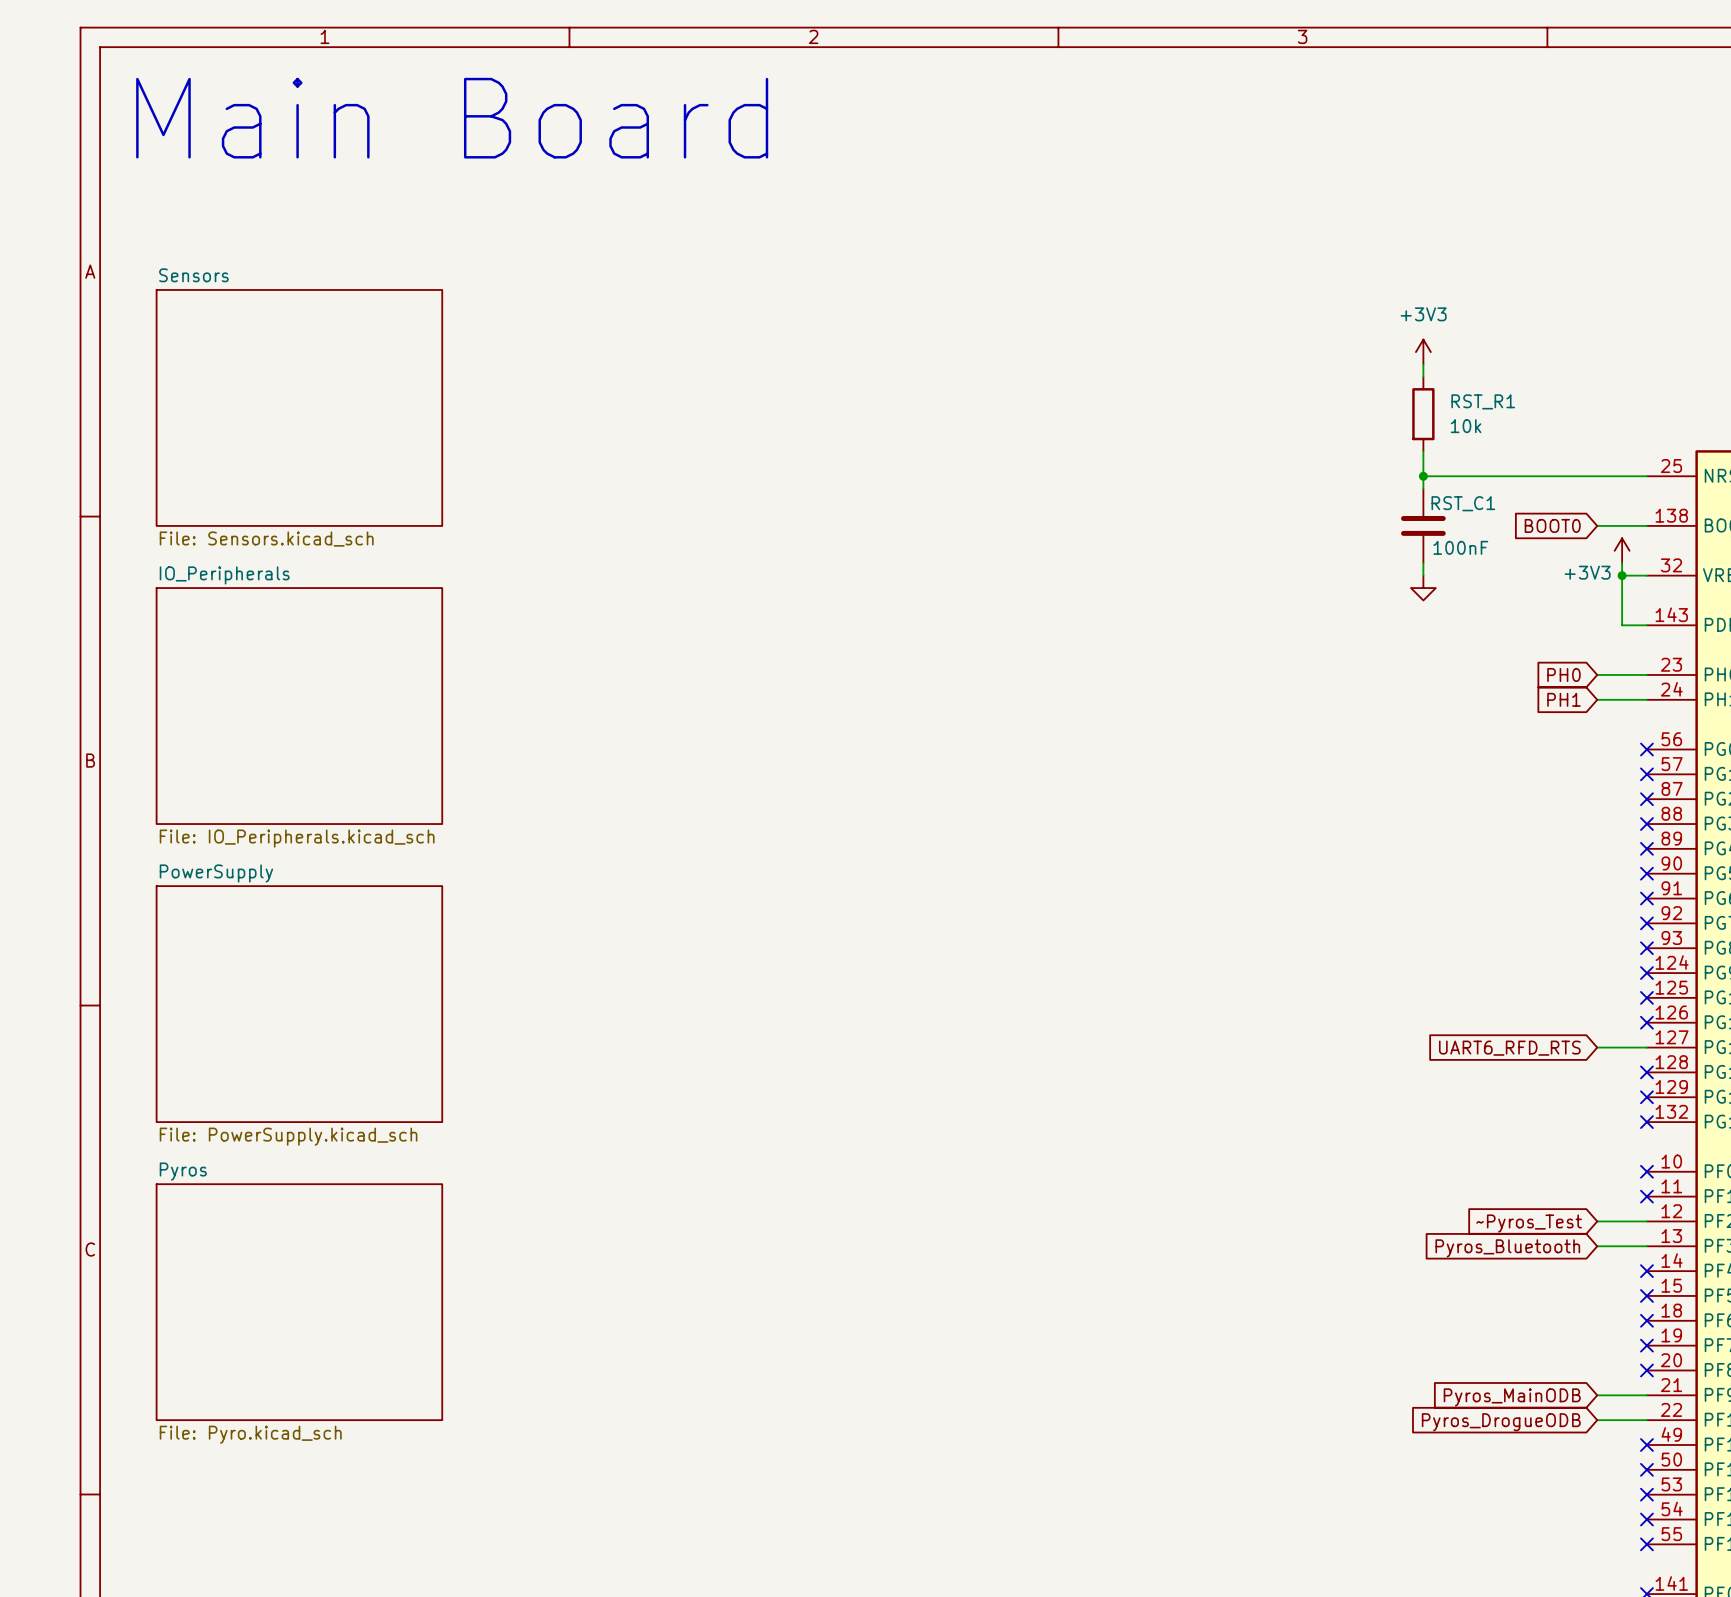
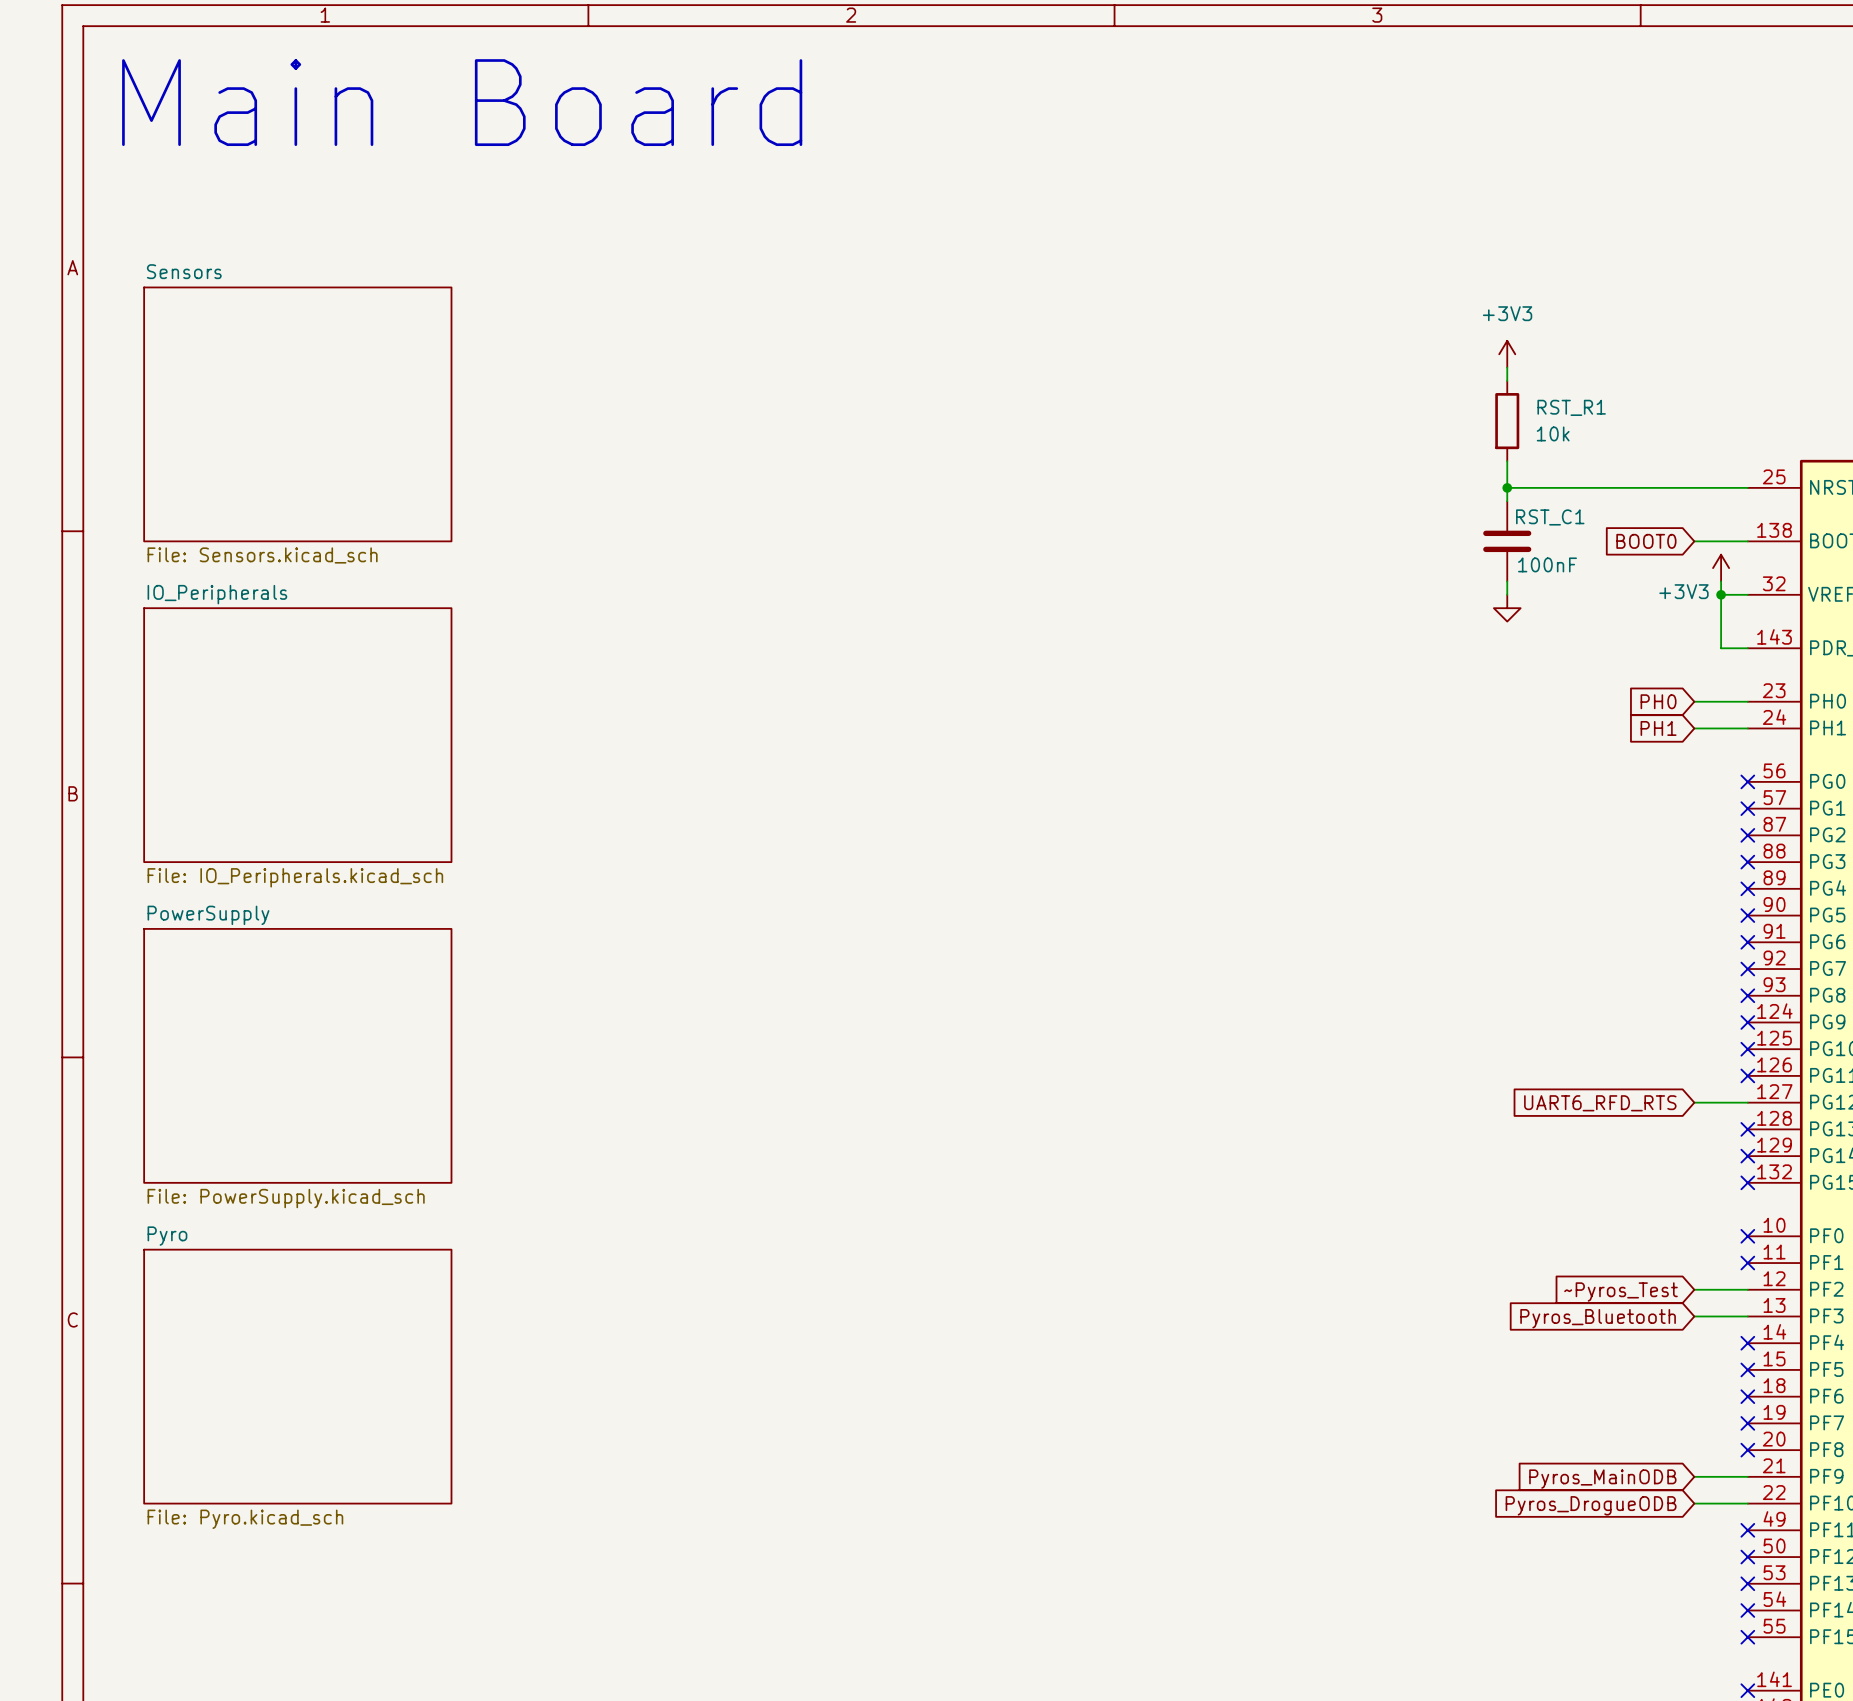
sheet Pyros name: Pyros (183, 1171) -> Pyro (167, 1236)

